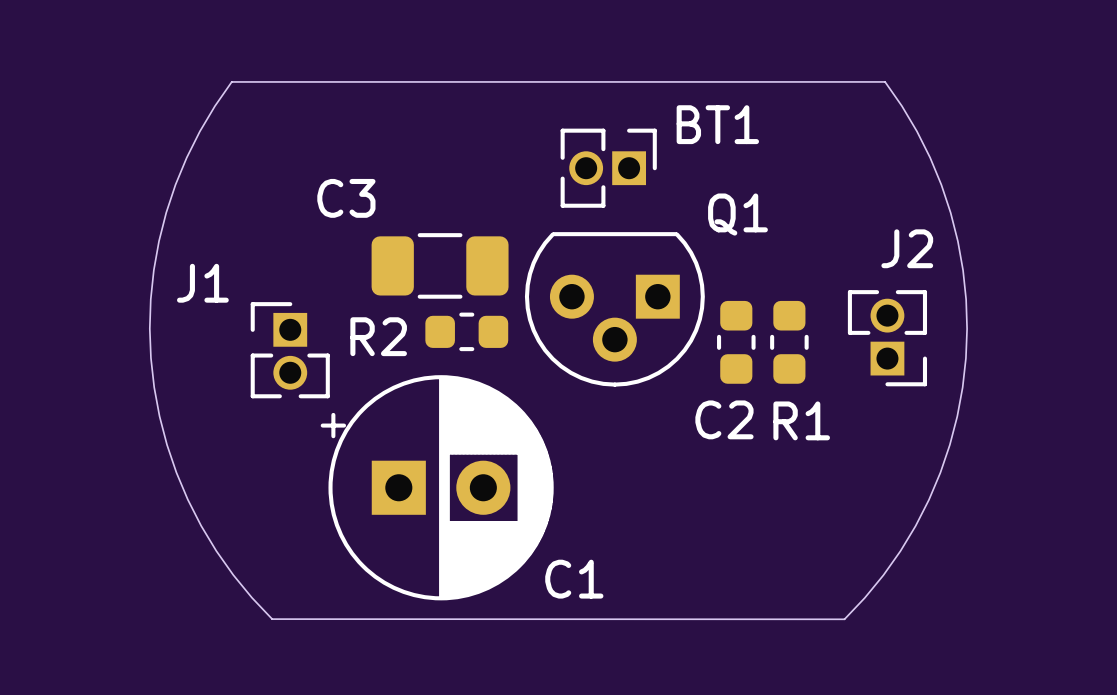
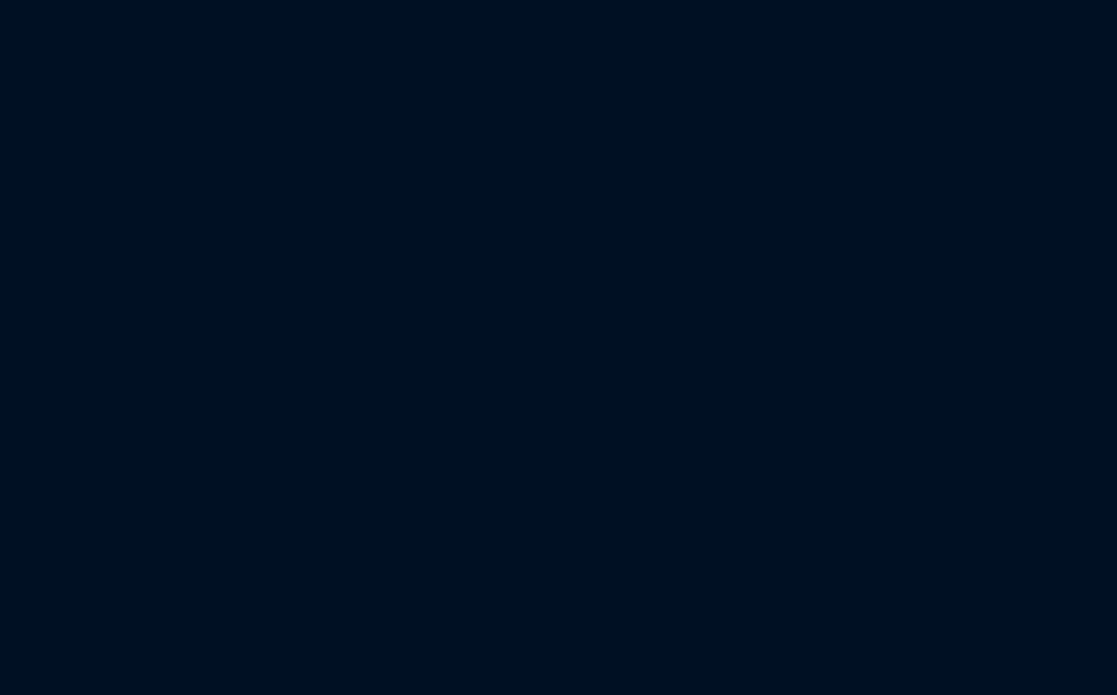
board edge: (231, 81) (885, 81) (916, 131) (930, 157) (950, 212) (963, 270) (967, 328) (962, 387) (949, 444) (928, 499) (900, 551) (883, 575) (844, 619) (272, 619) (233, 575) (216, 551) (187, 499) (166, 444) (154, 387) (150, 358) (150, 299) (159, 241) (166, 212) (186, 157) (199, 131) (231, 81) -> none
BT1: (608, 168) -> none
C3: (440, 265) -> none
Q1: (614, 309) -> none
R2: (466, 331) -> none
J2: (887, 338) -> none
C2: (736, 342) -> none
R1: (789, 342) -> none
J1: (290, 350) -> none
C1: (437, 487) -> none

